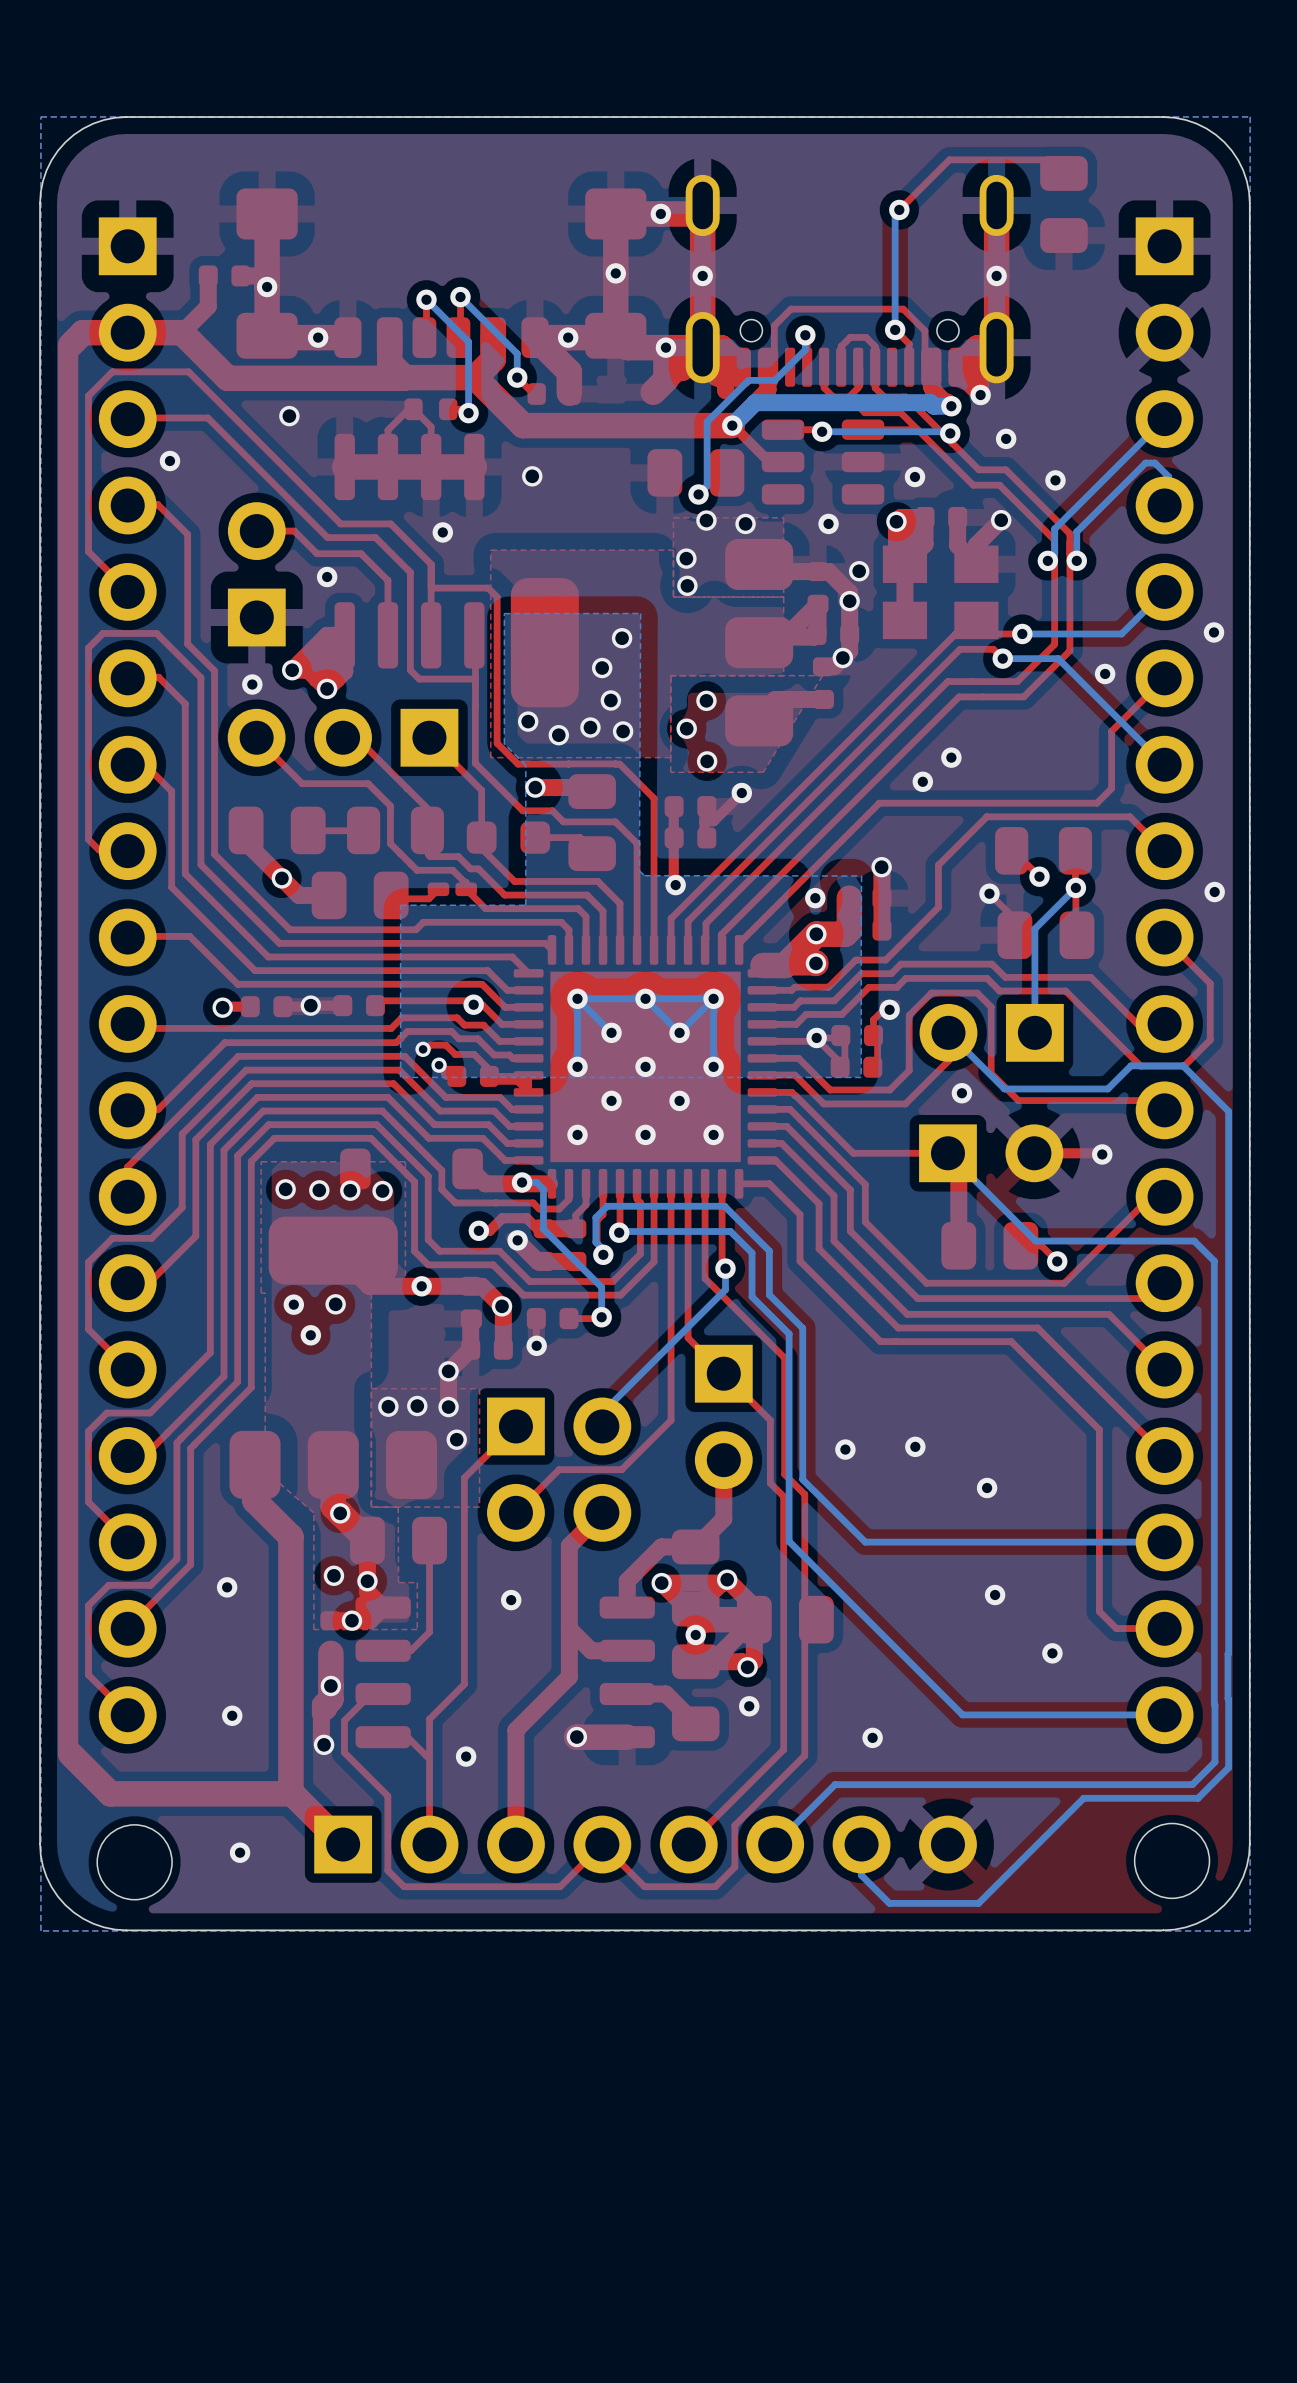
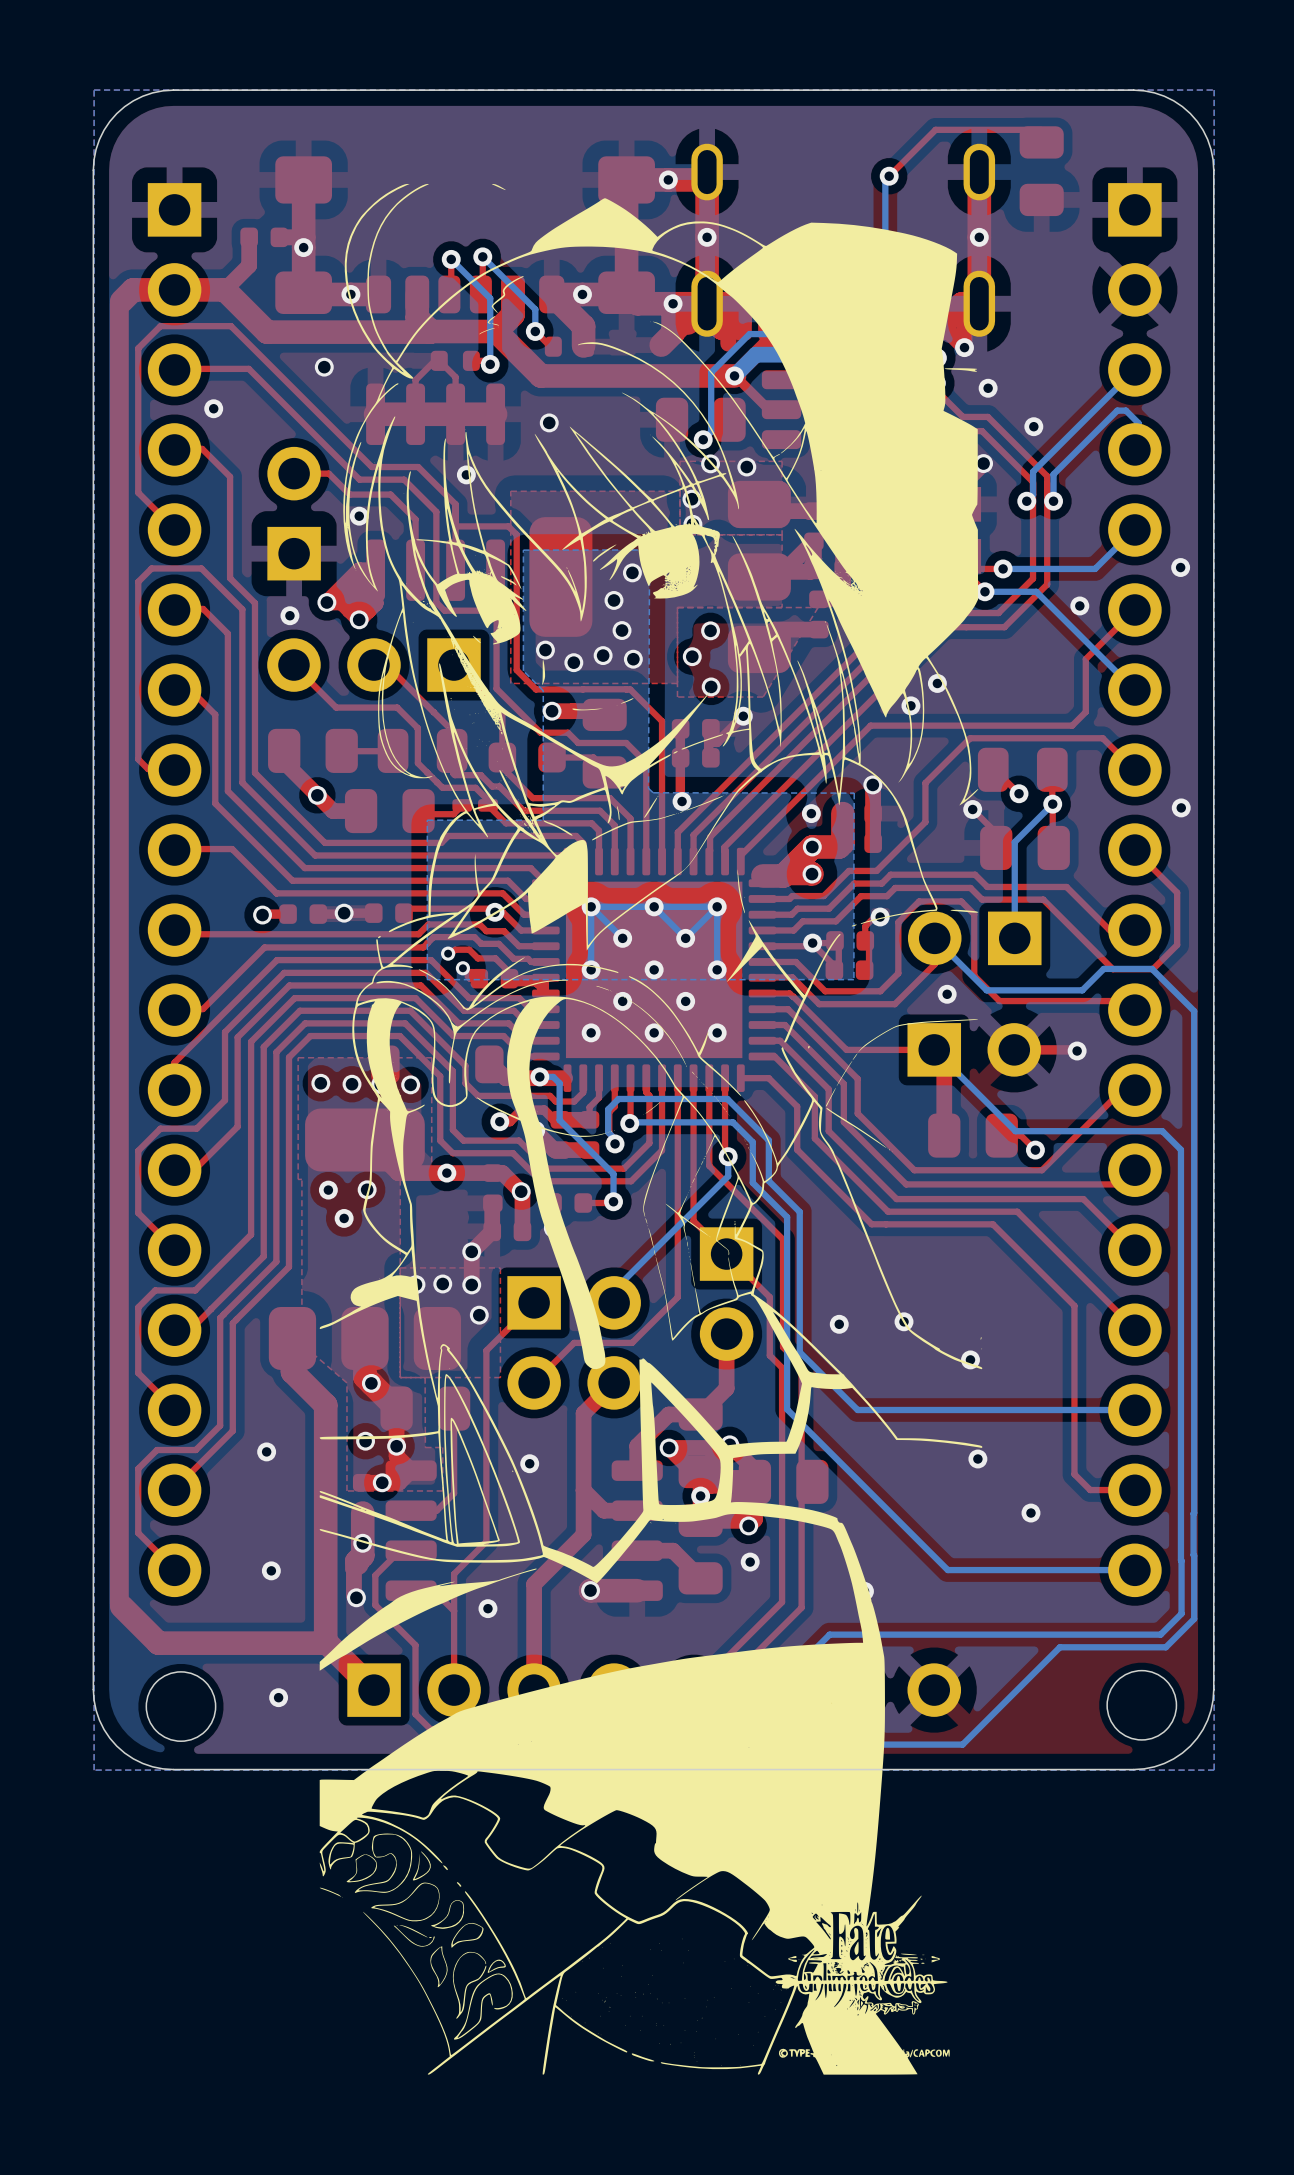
drawing: none -> [319, 183, 983, 2075]

